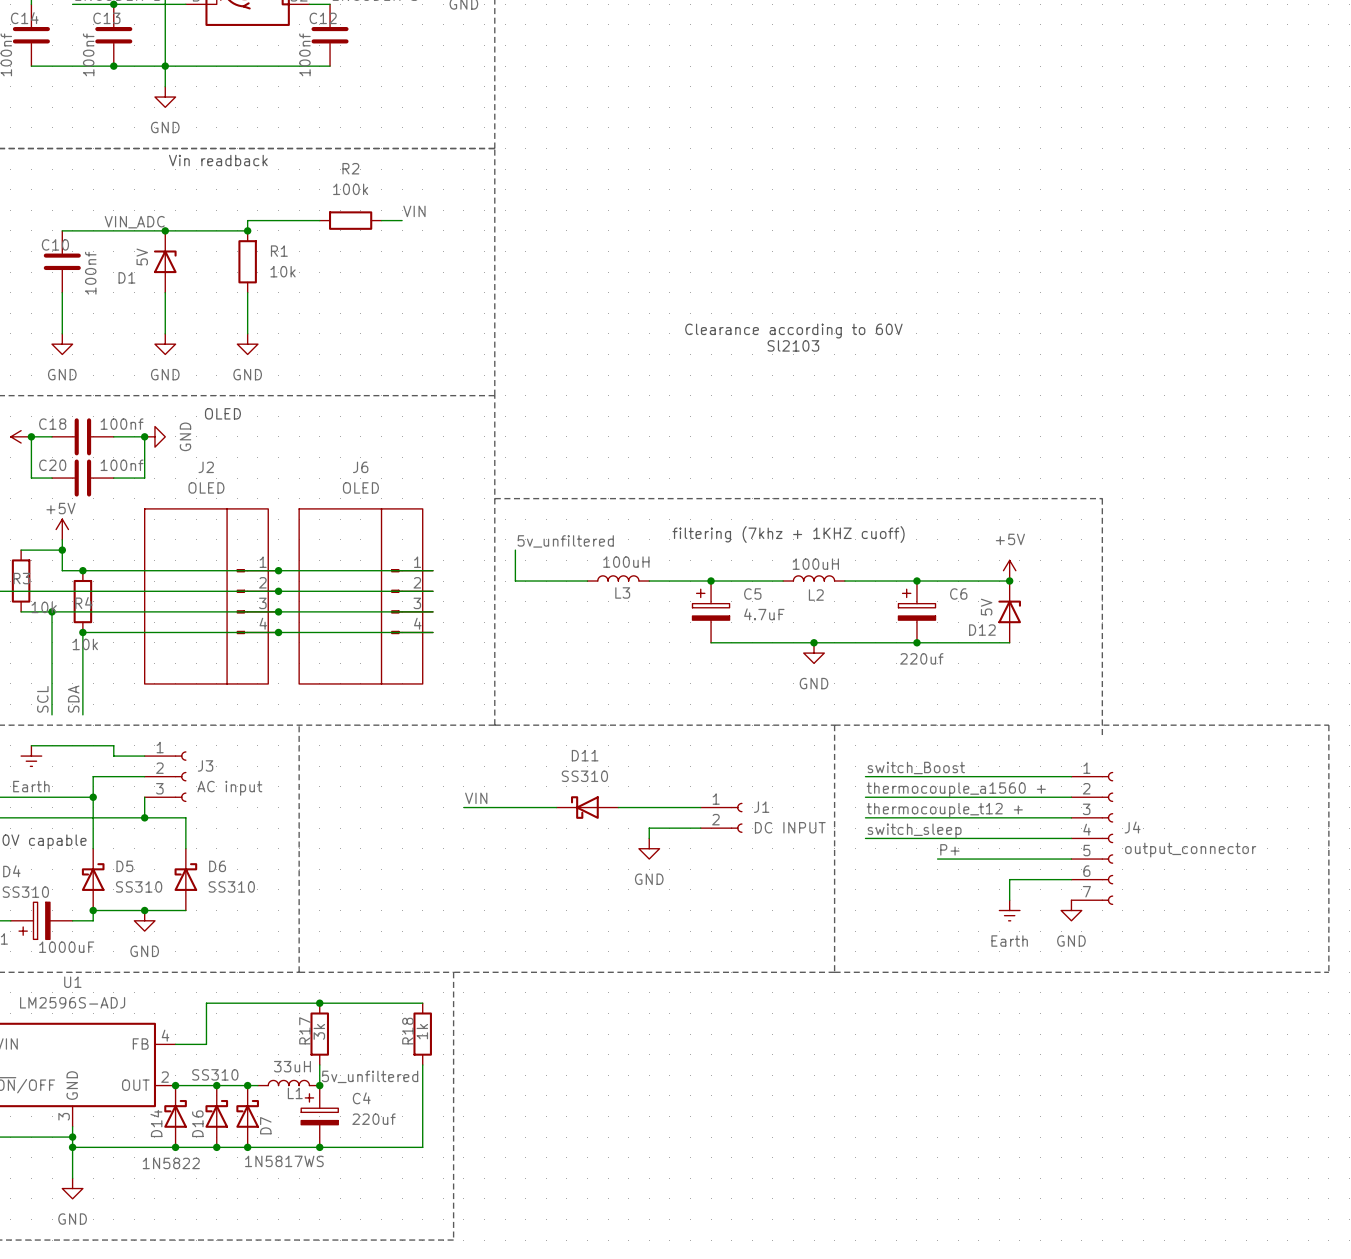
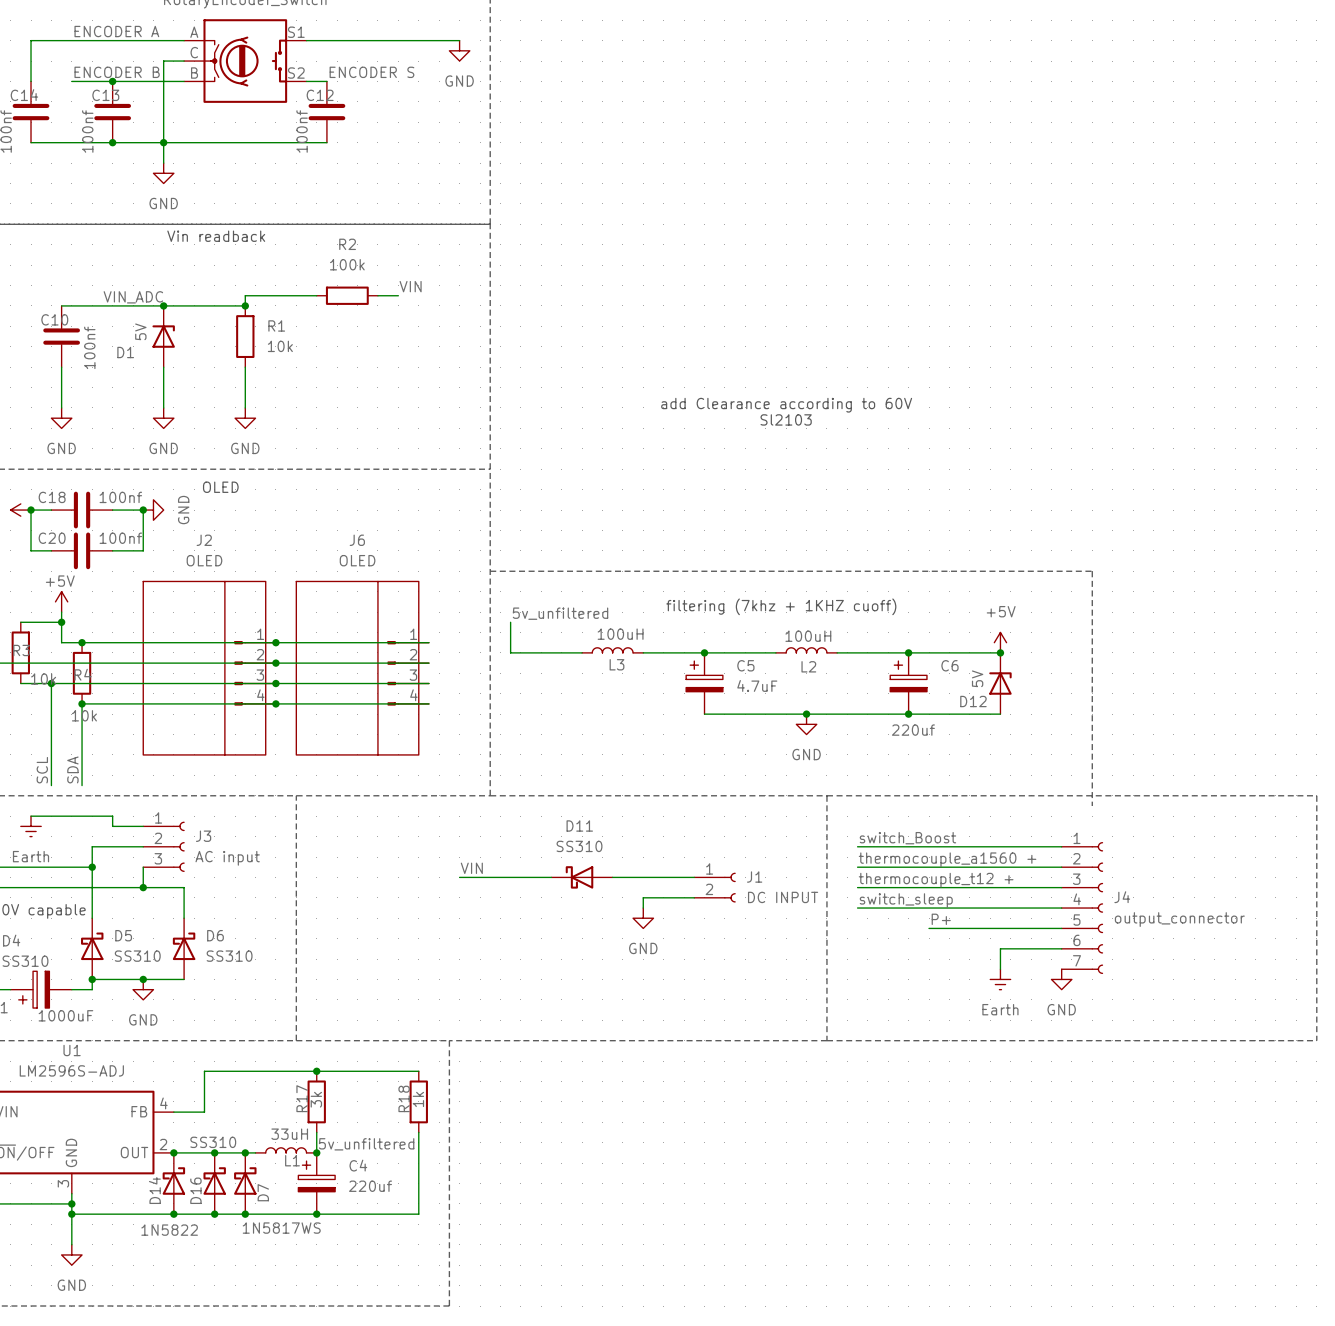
text: Clearance according to 60V (793, 331) -> add Clearance according to 60V (786, 405)

